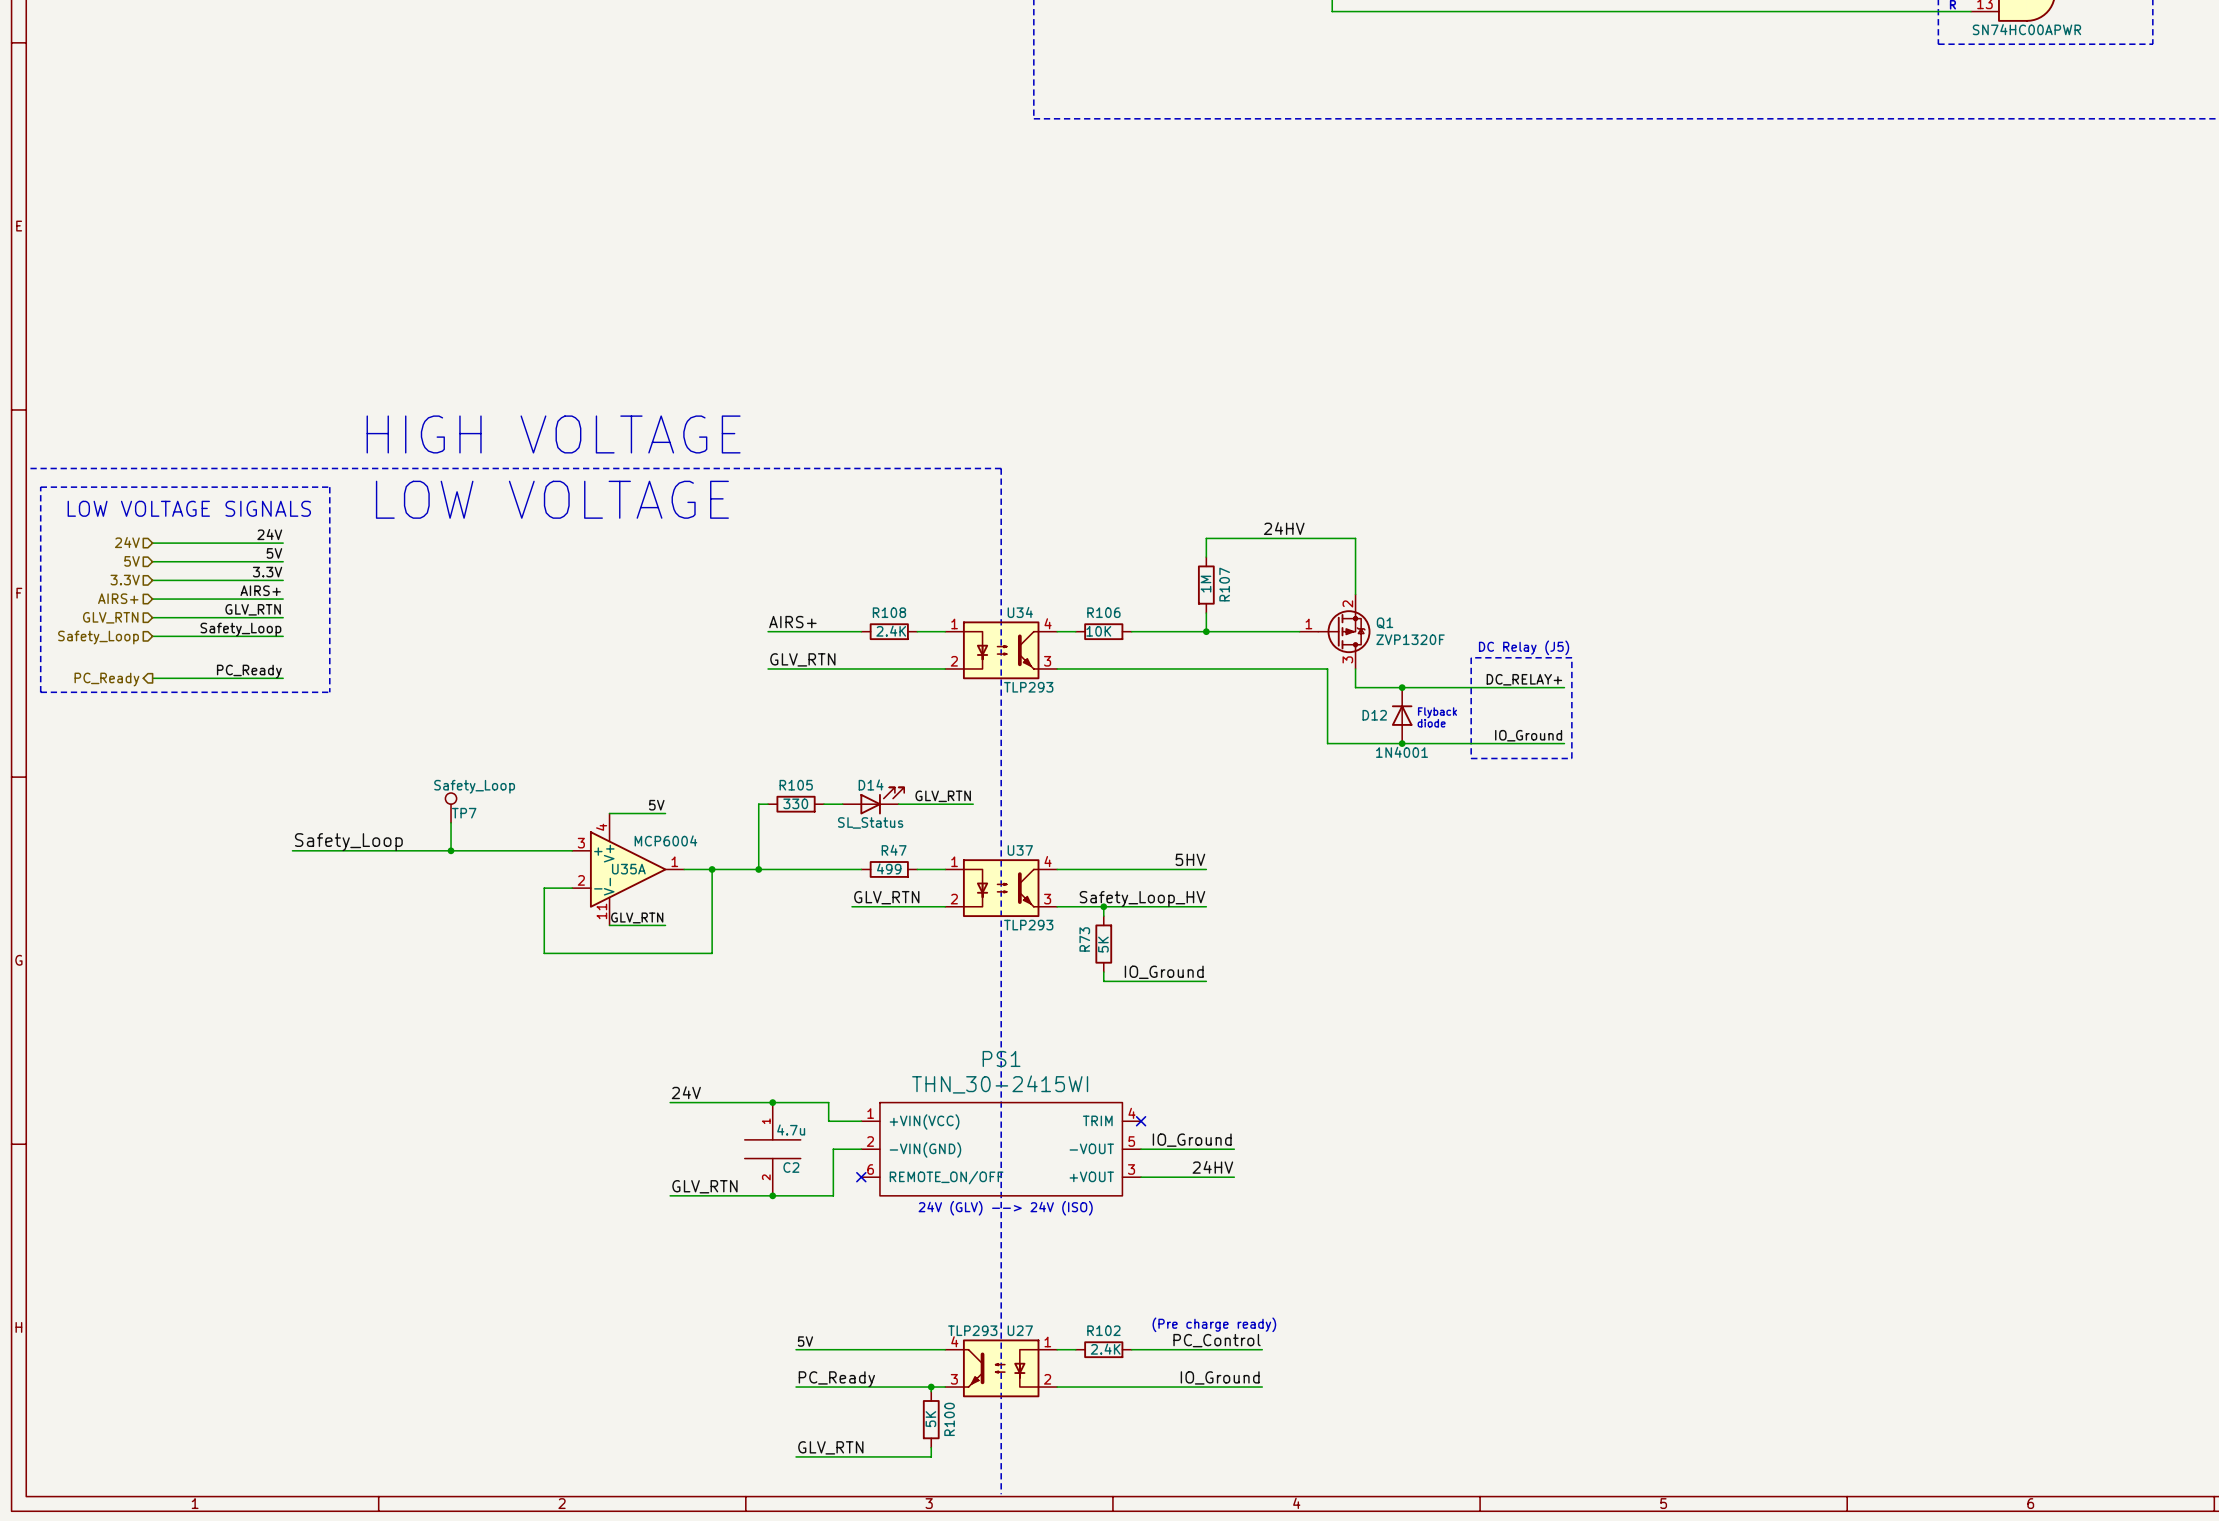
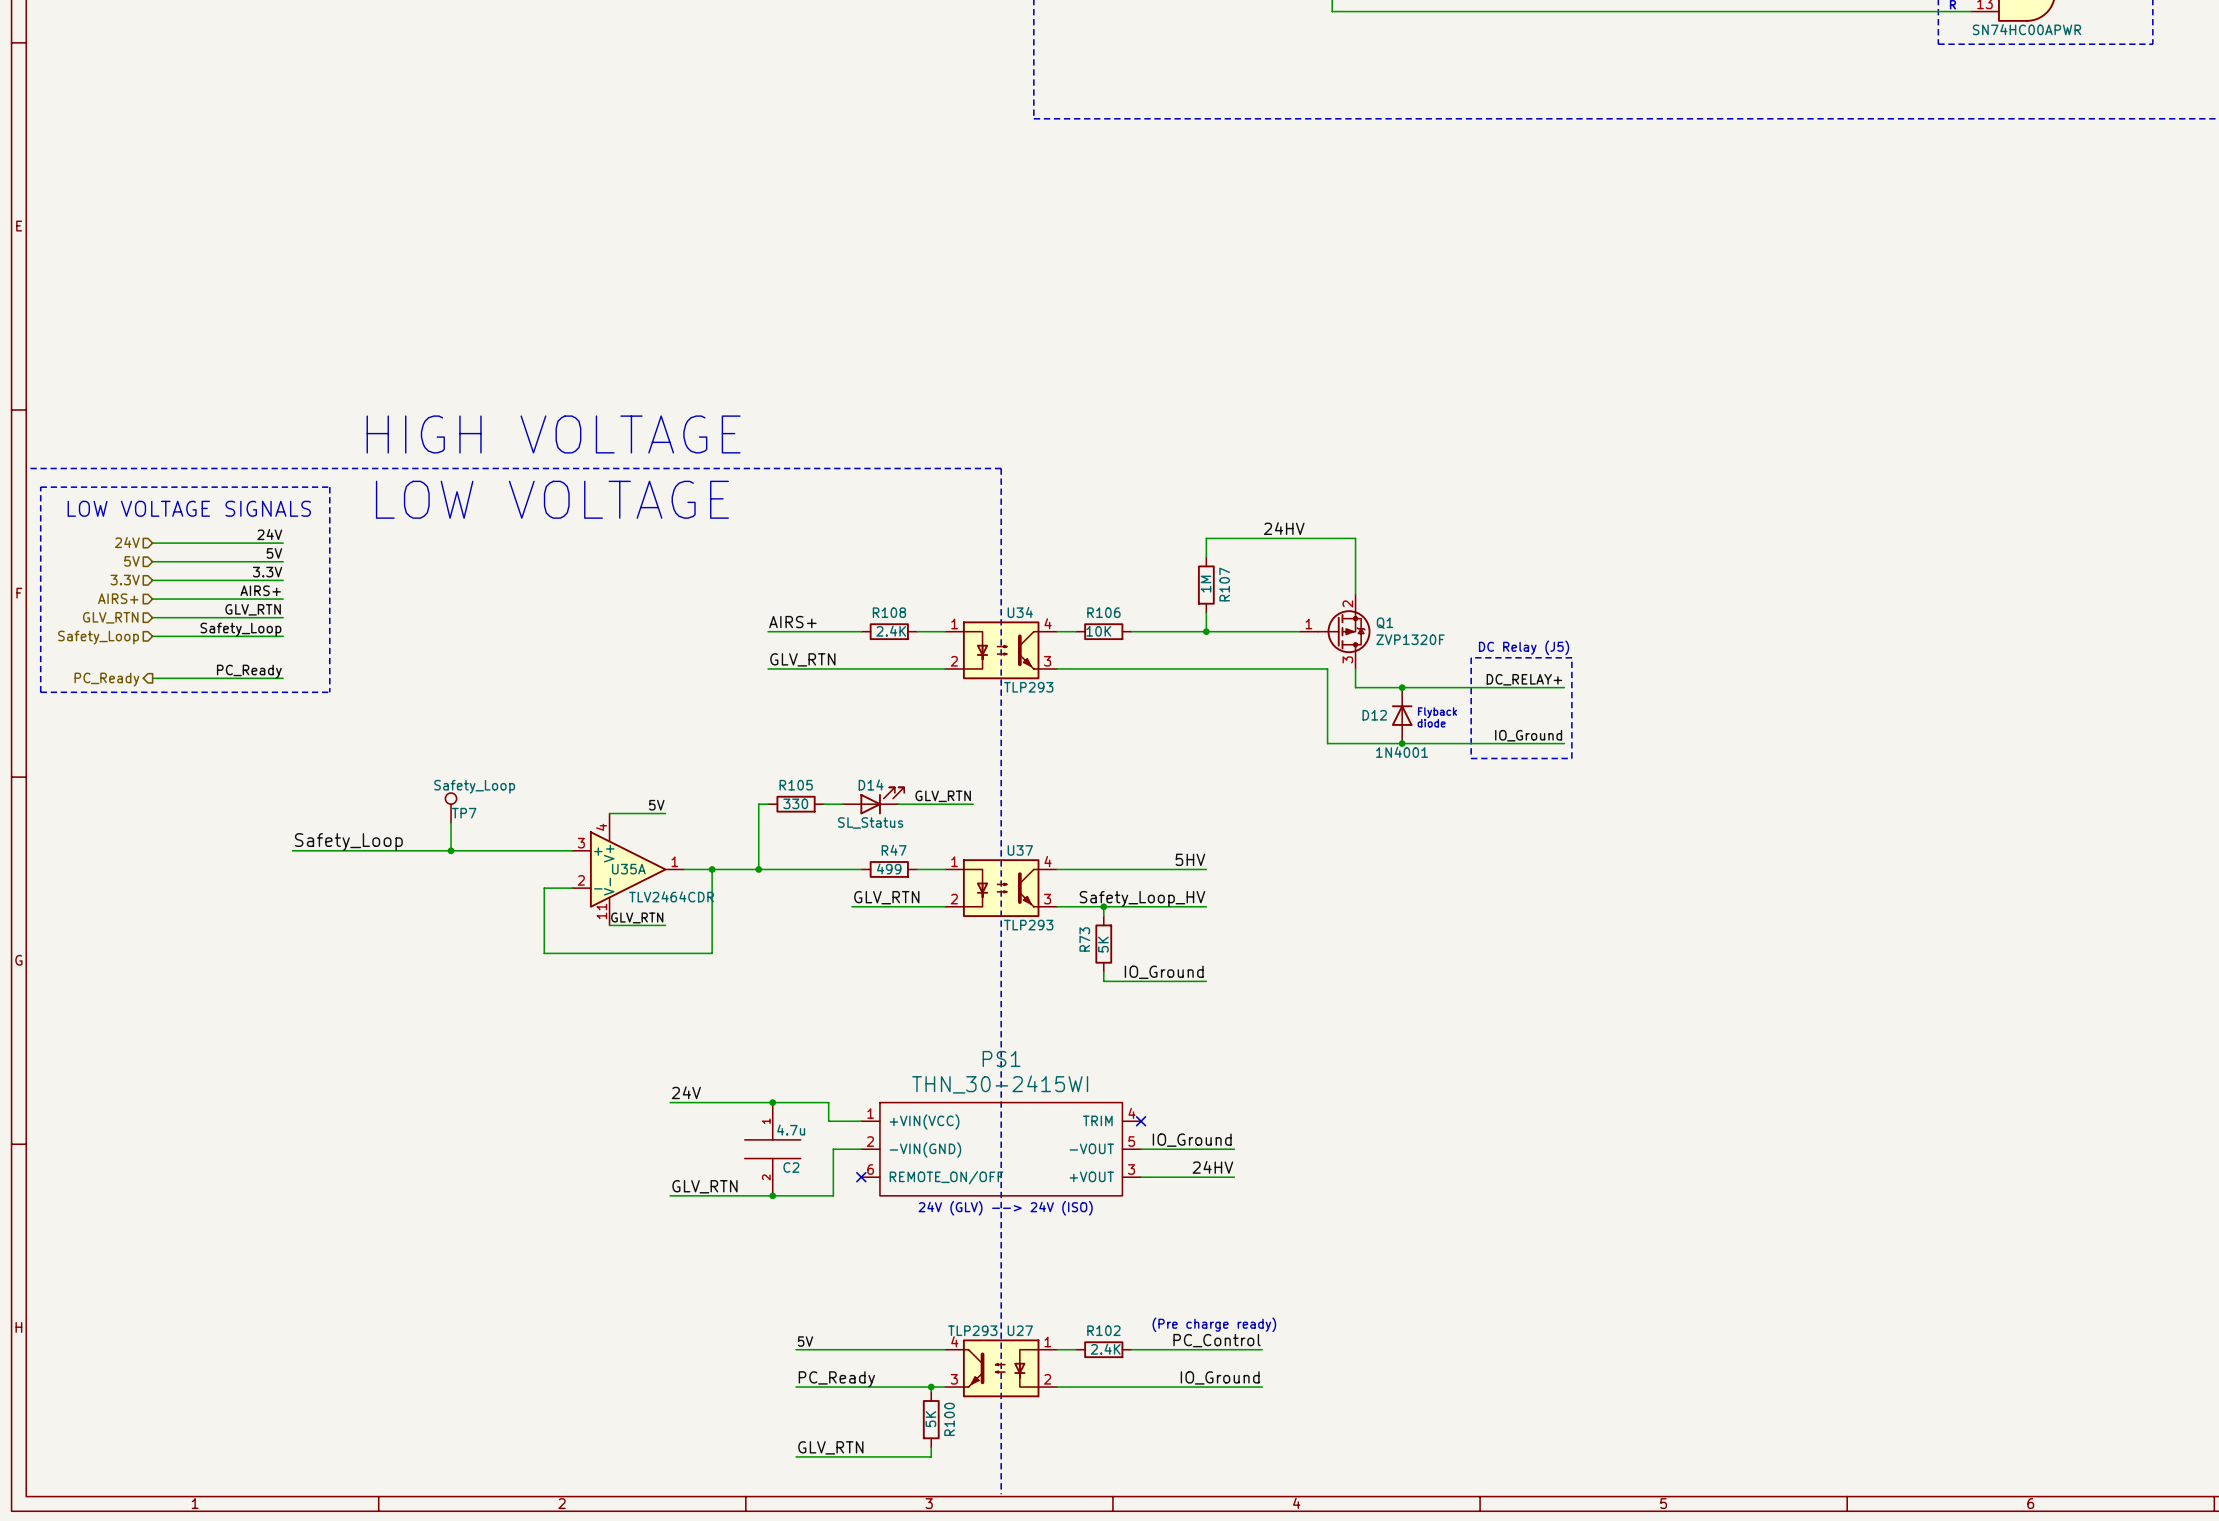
U35A value: MCP6004 (665, 840) -> none
part value: none -> TLV2464CDR (671, 896)

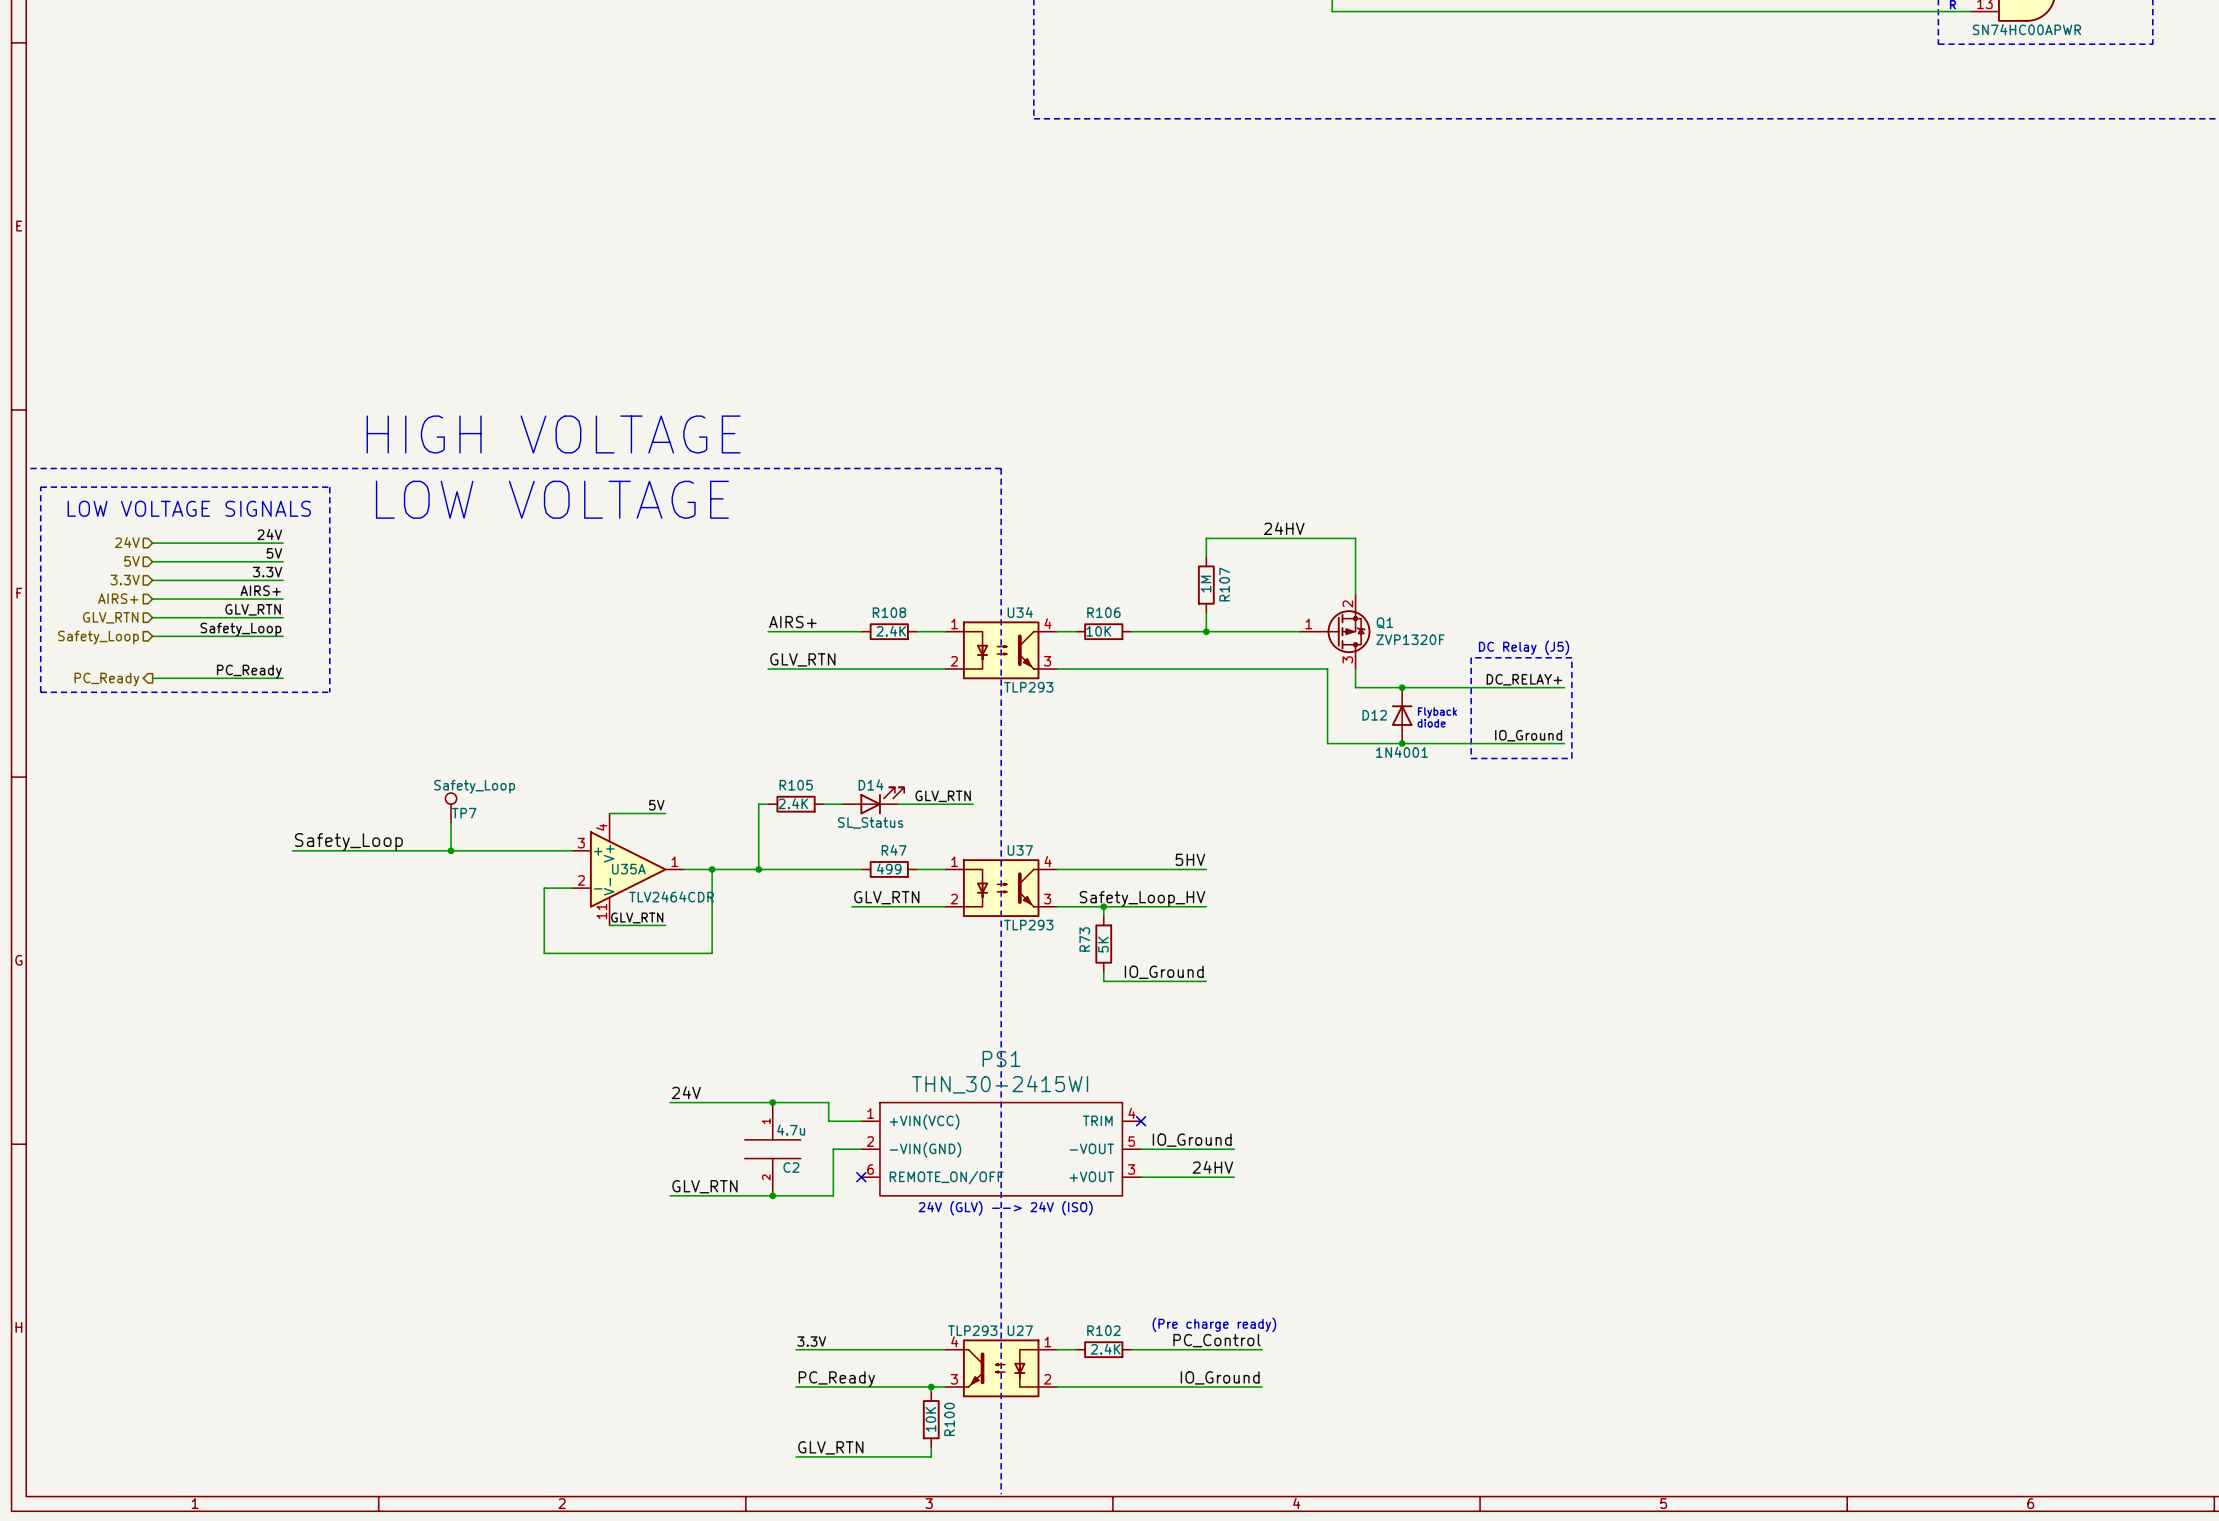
R105 value: 330 (795, 803) -> 2.4K (793, 803)
label: 5V (805, 1341) -> 3.3V (811, 1341)
R100 value: 5K (930, 1419) -> 10K (930, 1419)

